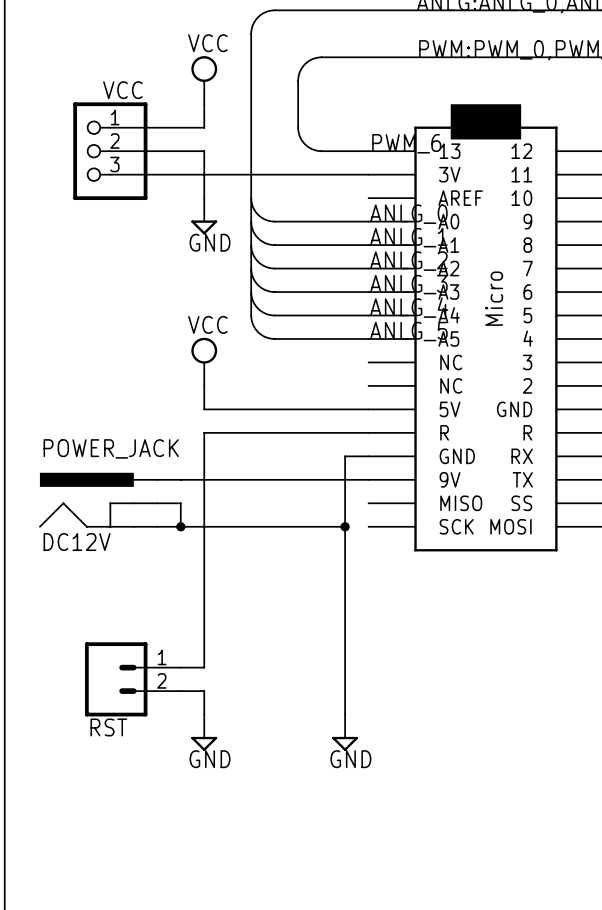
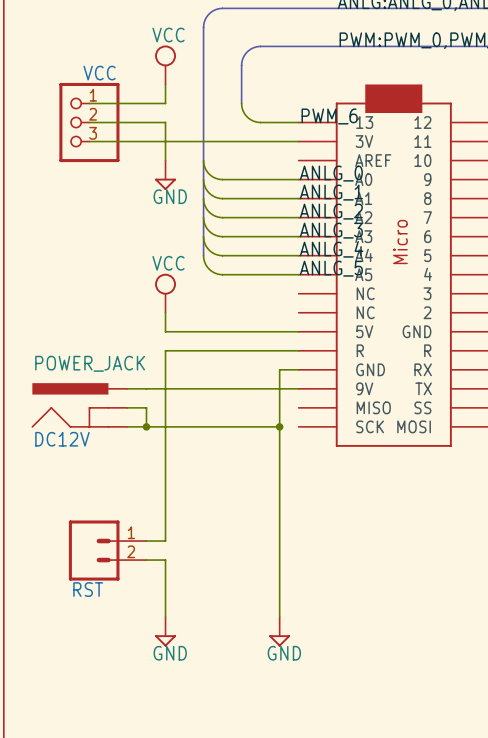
power symbol position: GND (204, 732) -> GND (165, 631)
power symbol position: GND (345, 732) -> GND (279, 631)

